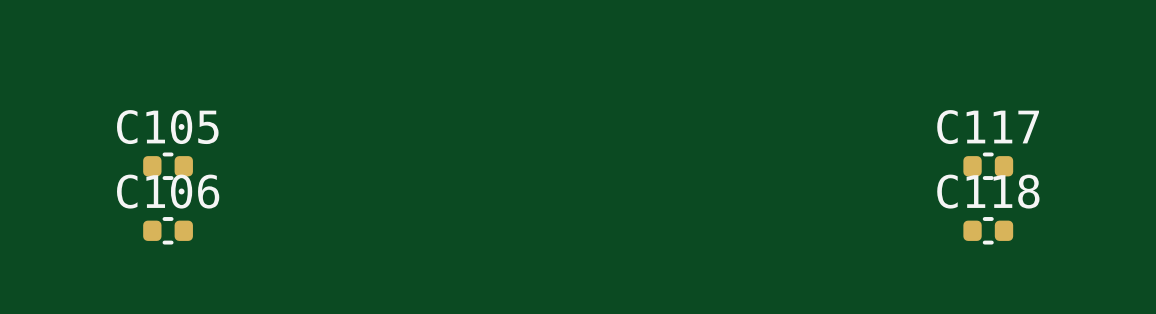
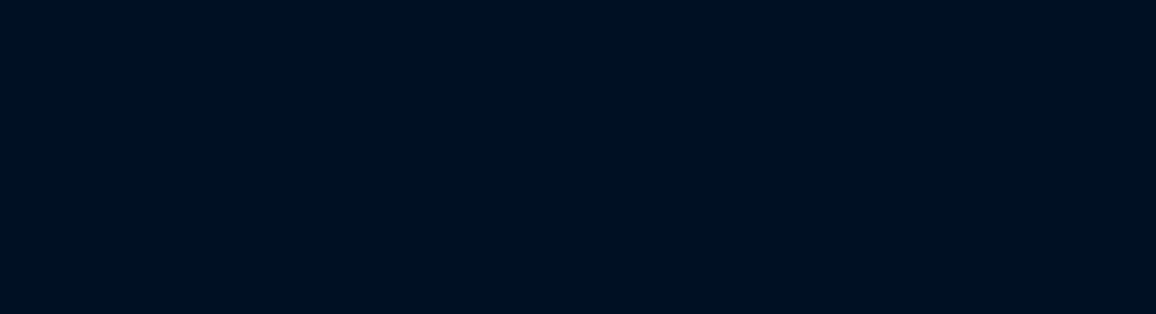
C105: (168, 166) -> none
C117: (988, 166) -> none
C106: (168, 230) -> none
C118: (988, 230) -> none

